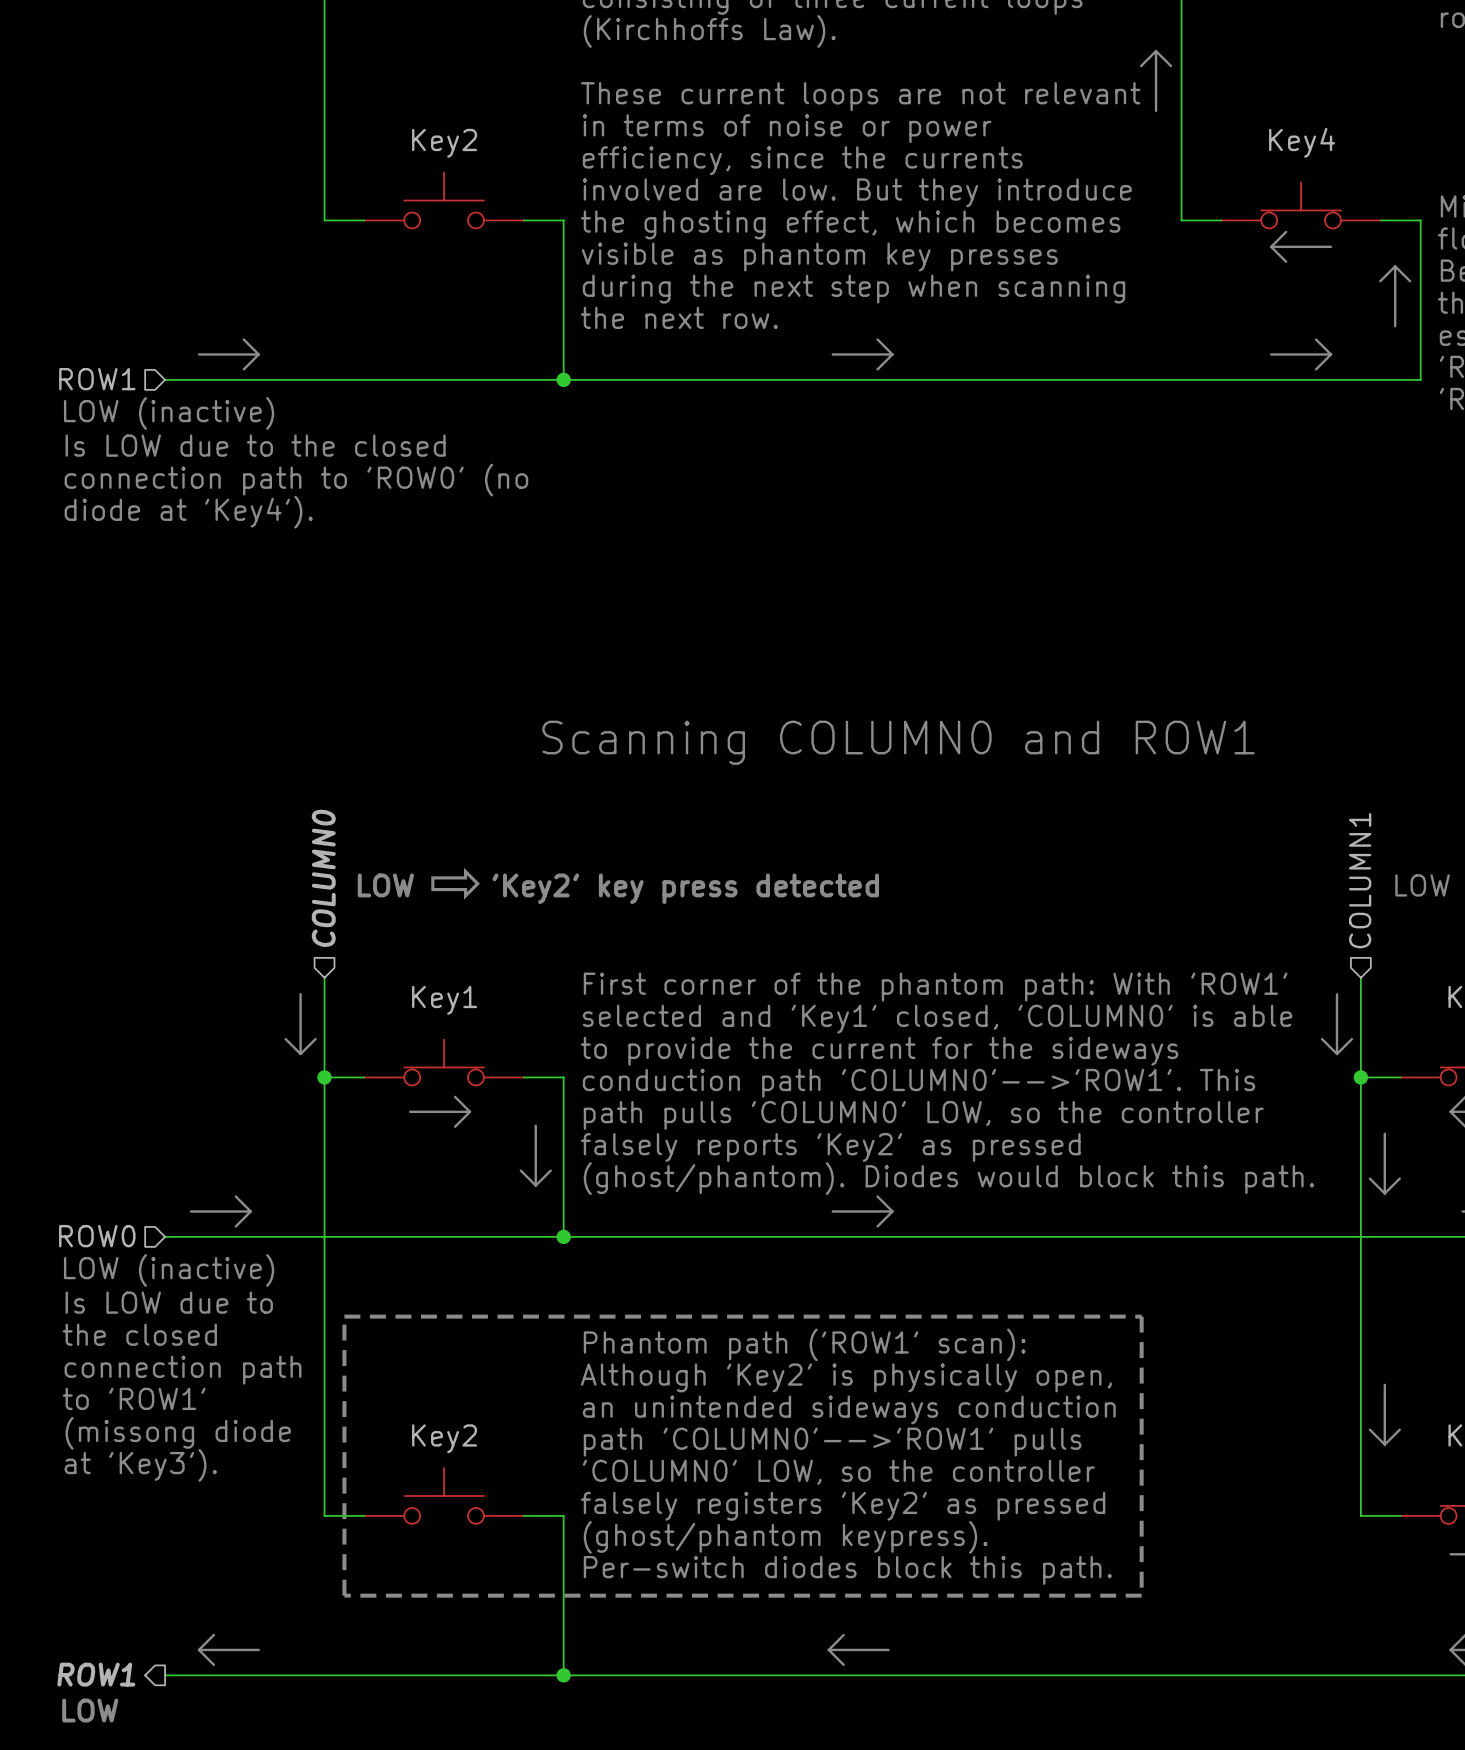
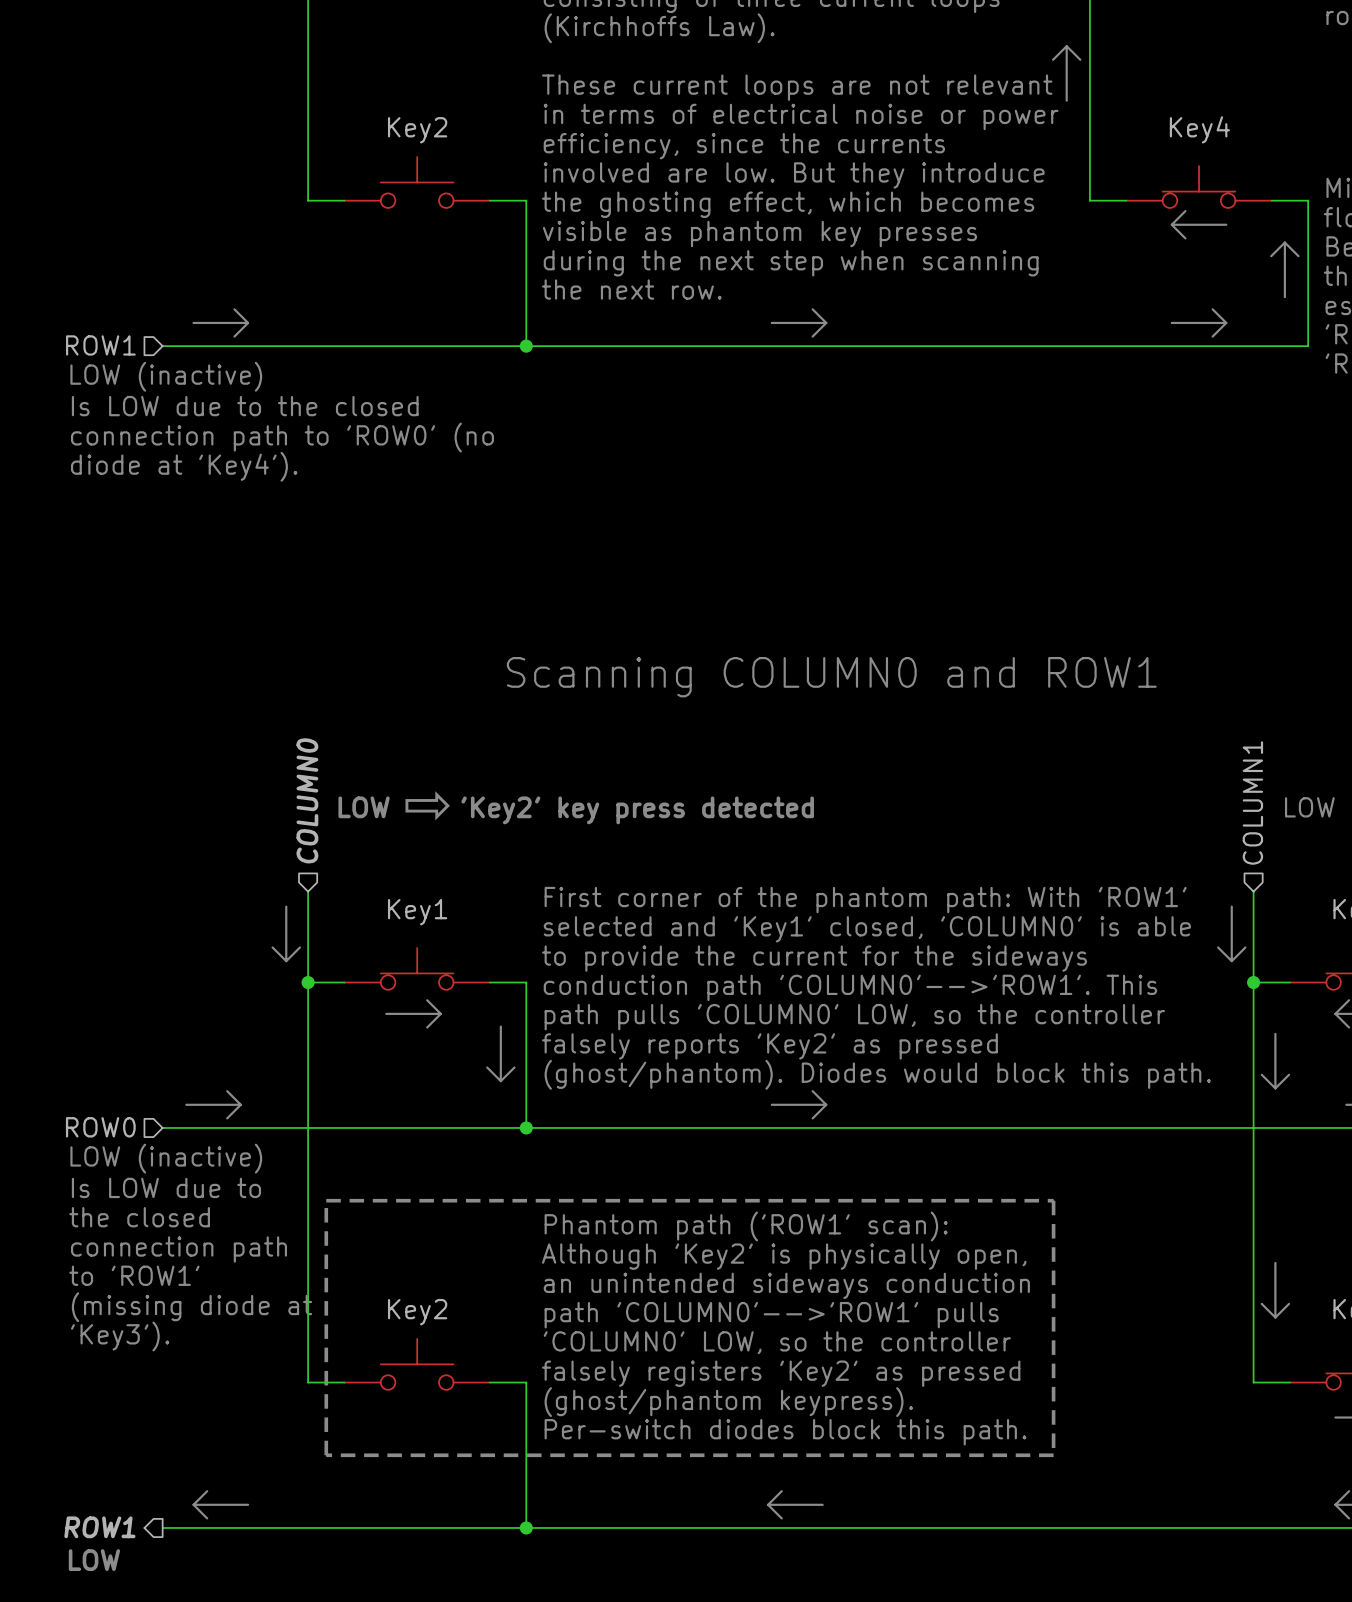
text: in terms of noise or power (787, 128) -> in terms of electrical noise or power (801, 116)
text: (missong diode (178, 1433) -> (missing diode at (191, 1307)
text: at 'Key3'). (140, 1465) -> 'Key3'). (120, 1336)

